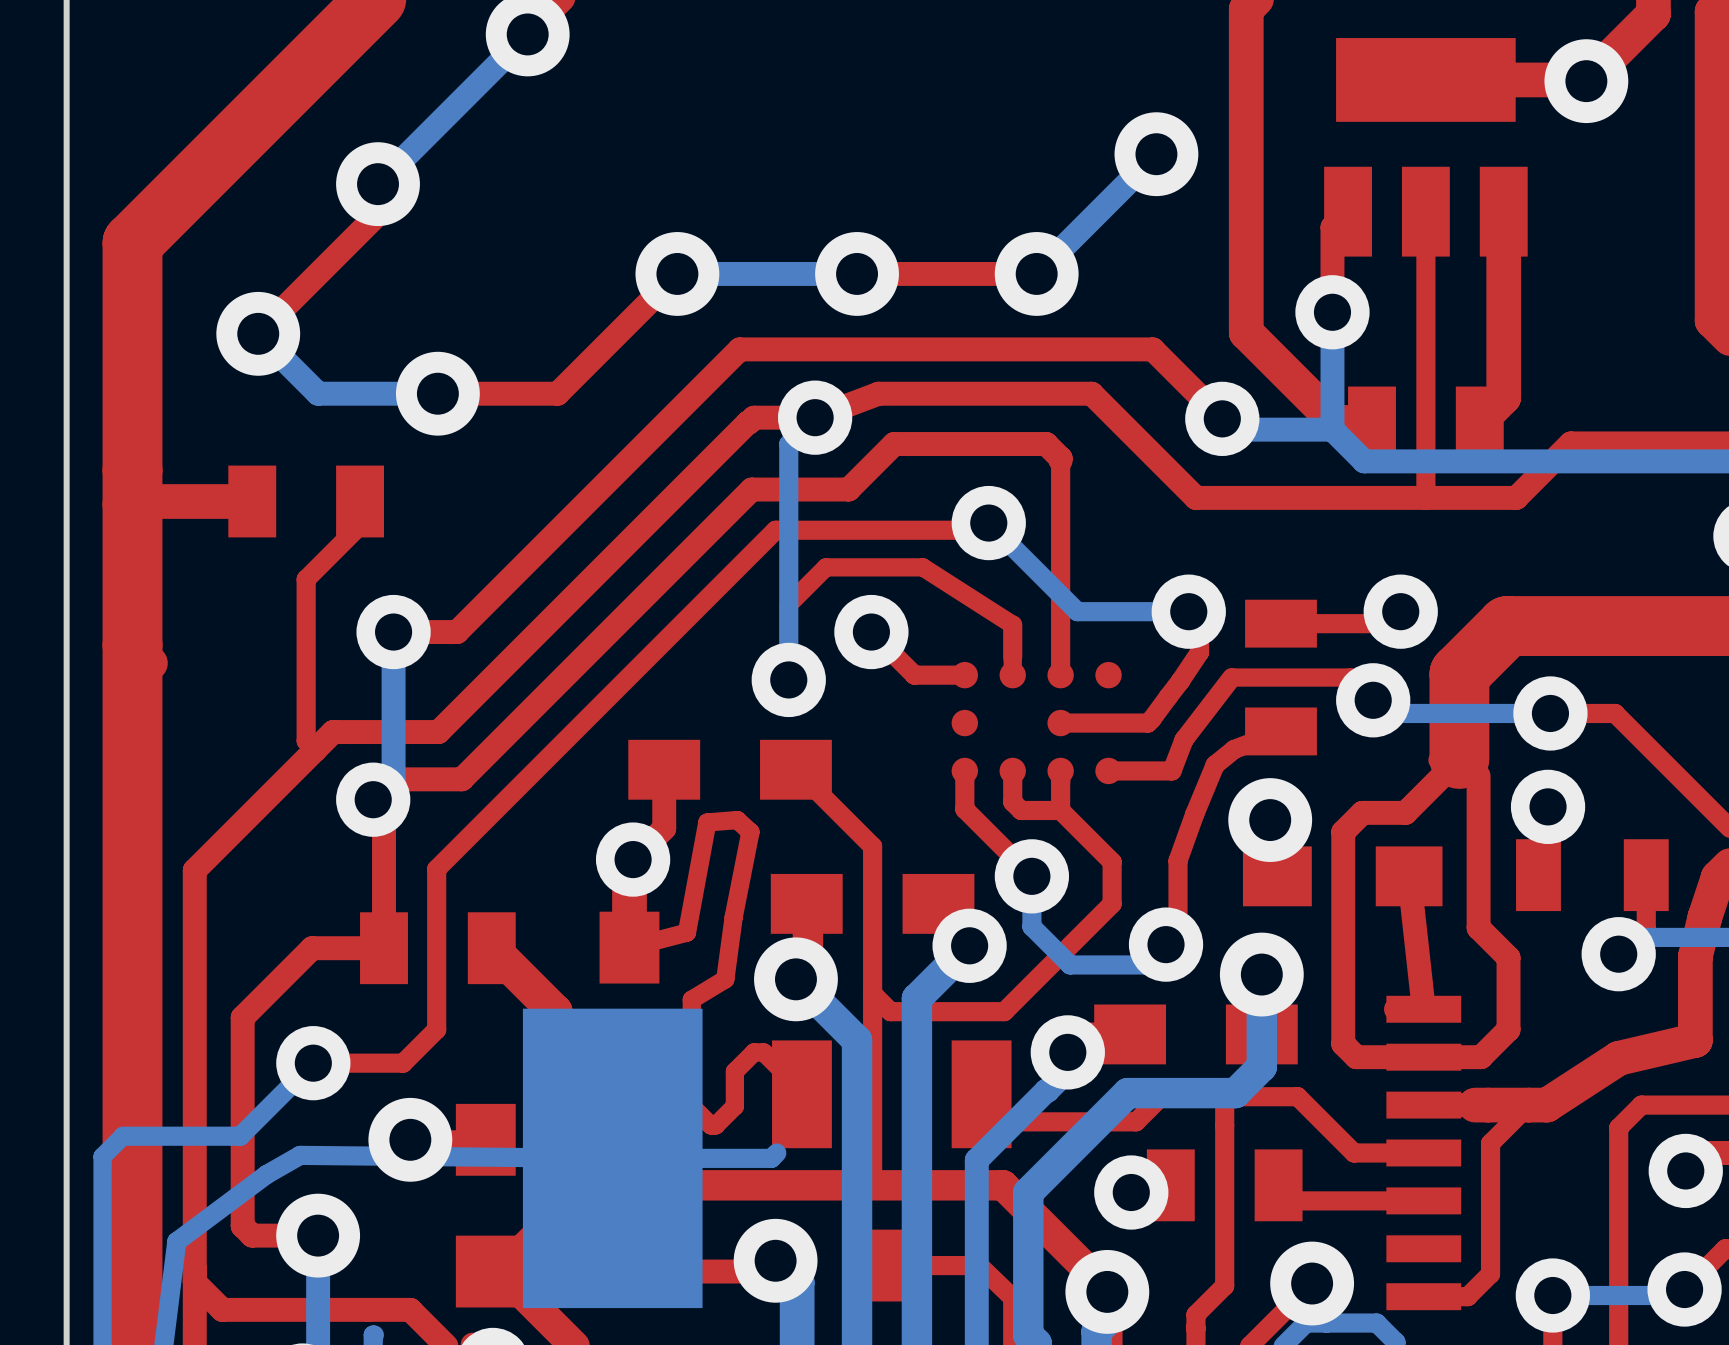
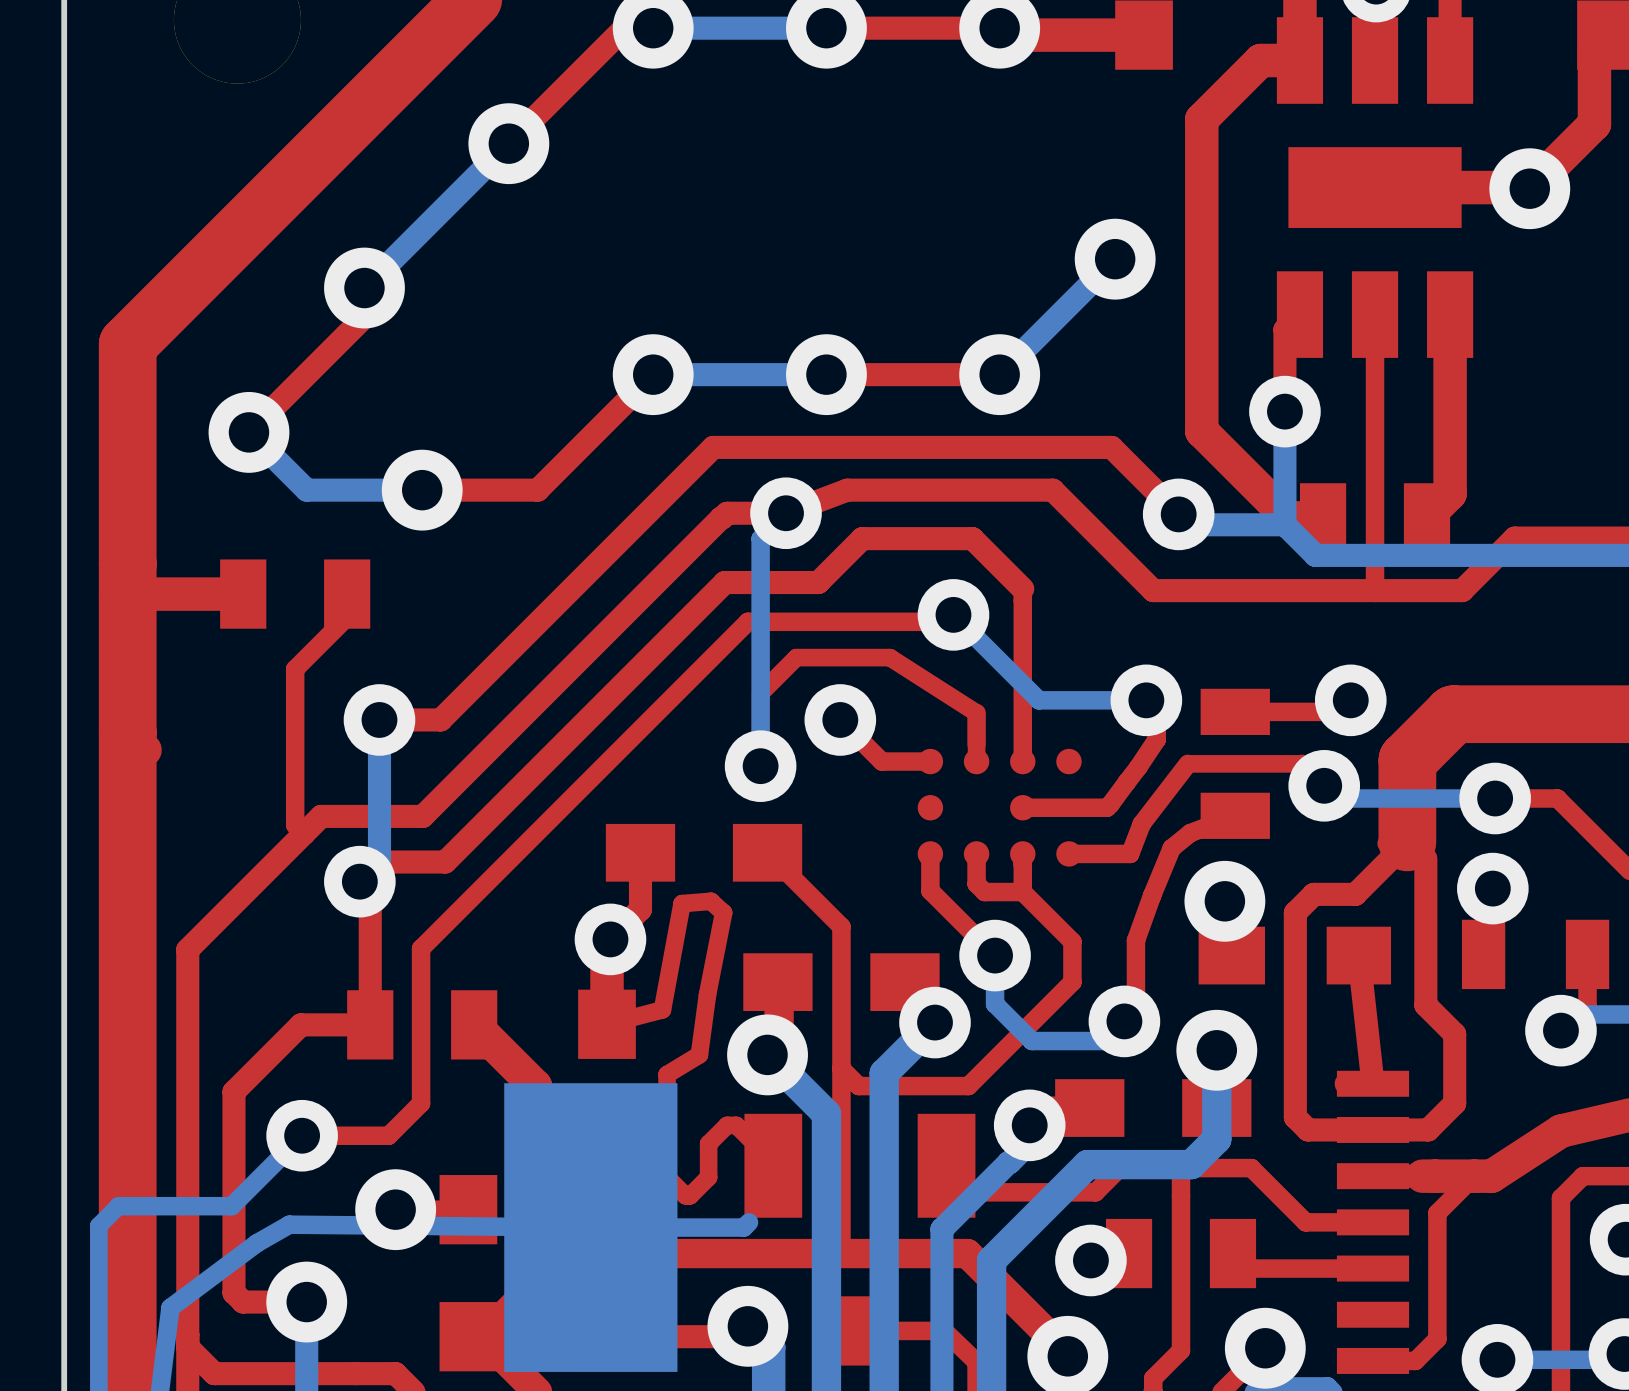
top track: (1008, 444) (1046, 444) (1060, 458) -> (972, 538) (1022, 588)
top track: (1060, 460) (1060, 496) -> none

